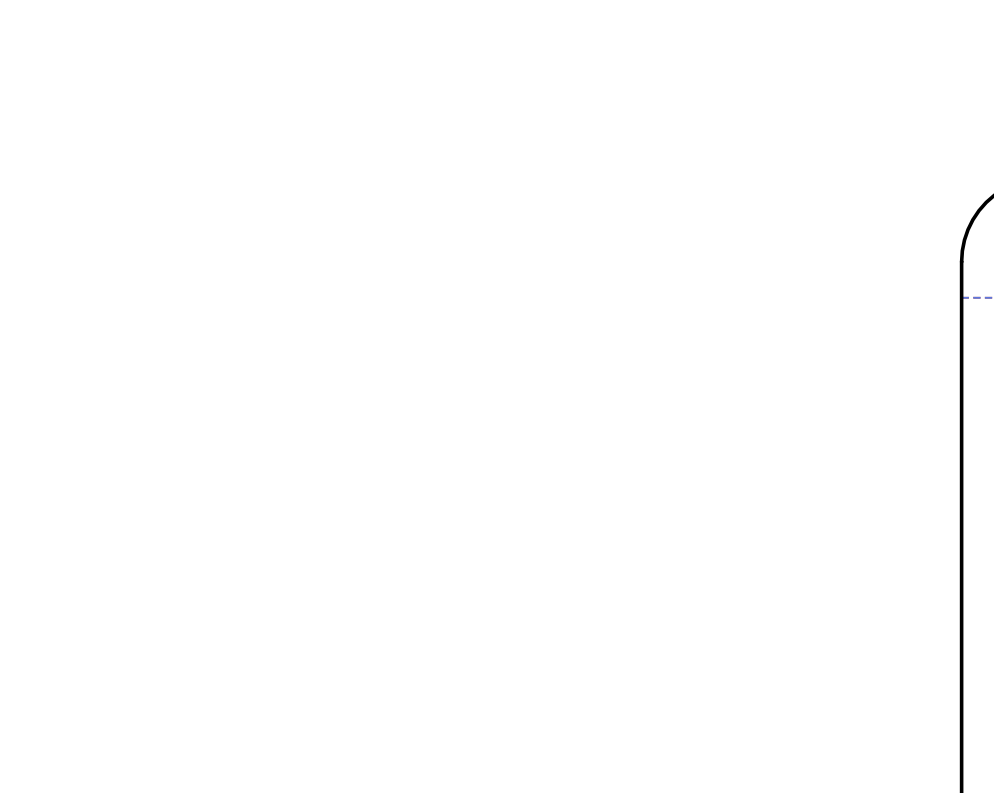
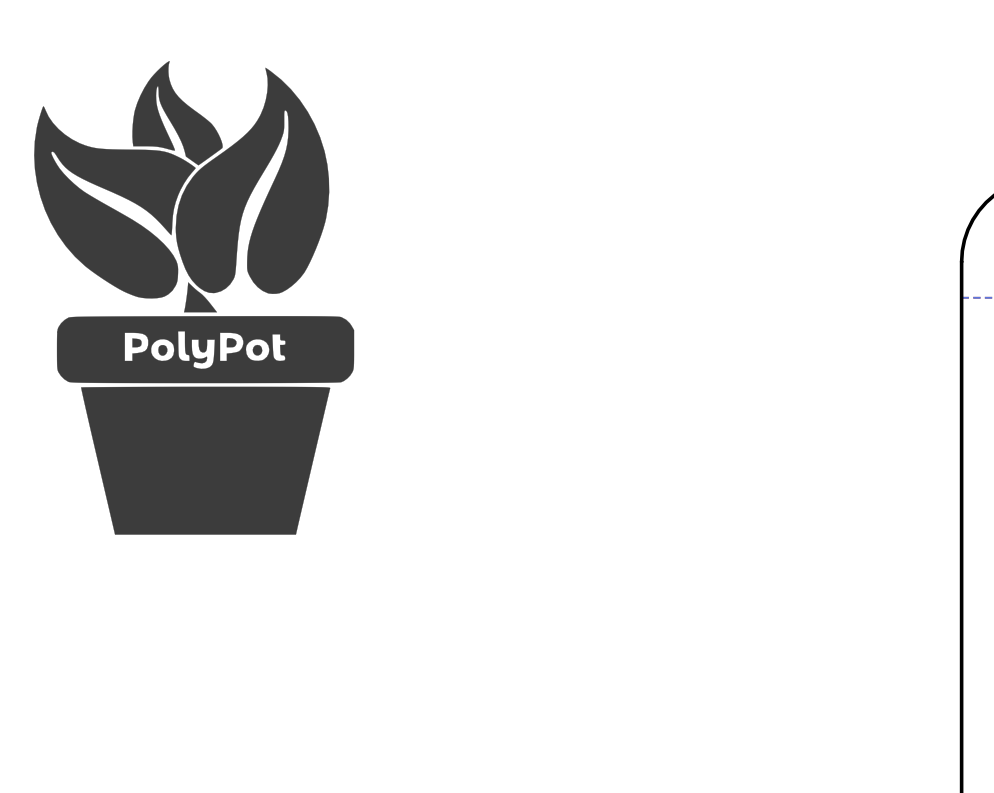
drawing: none -> [34, 61, 355, 535]

